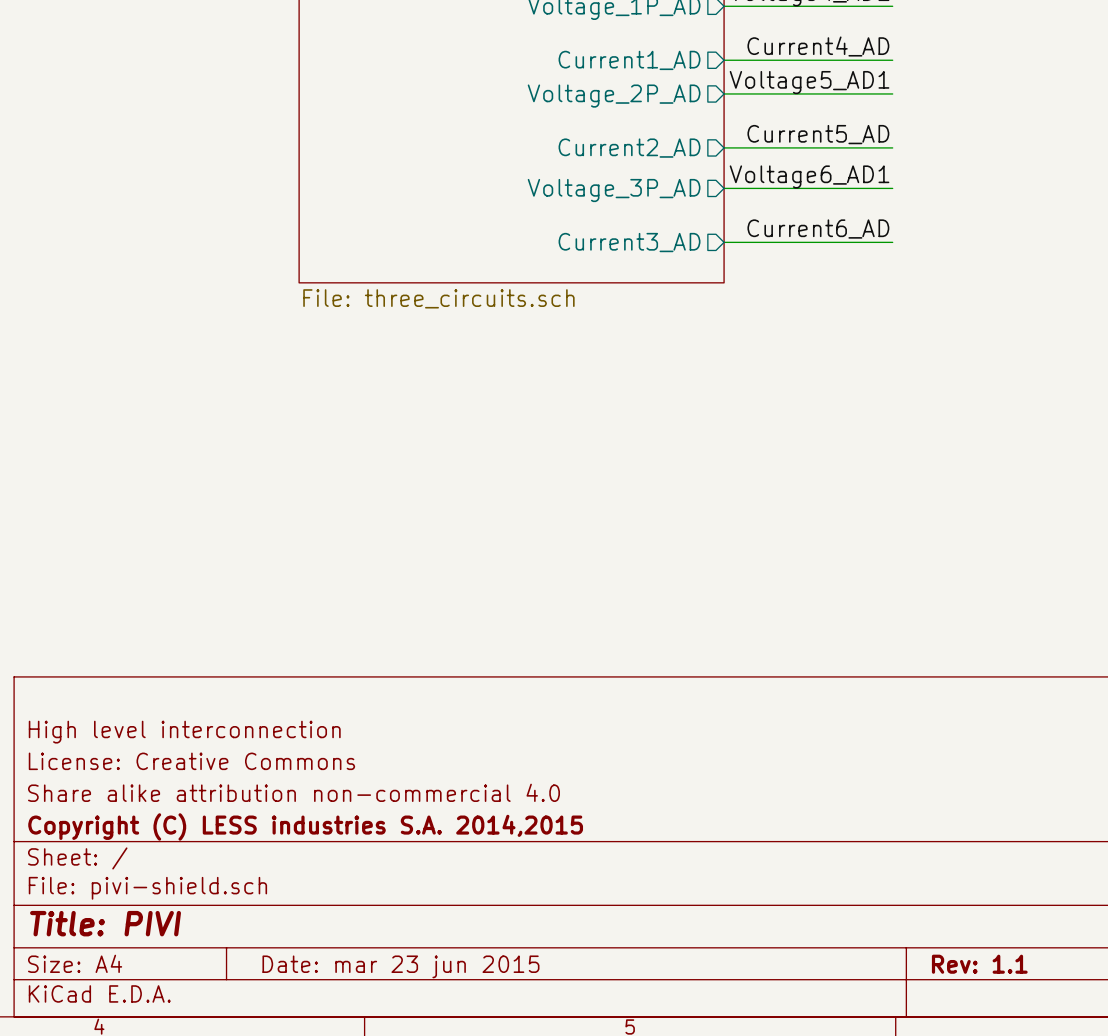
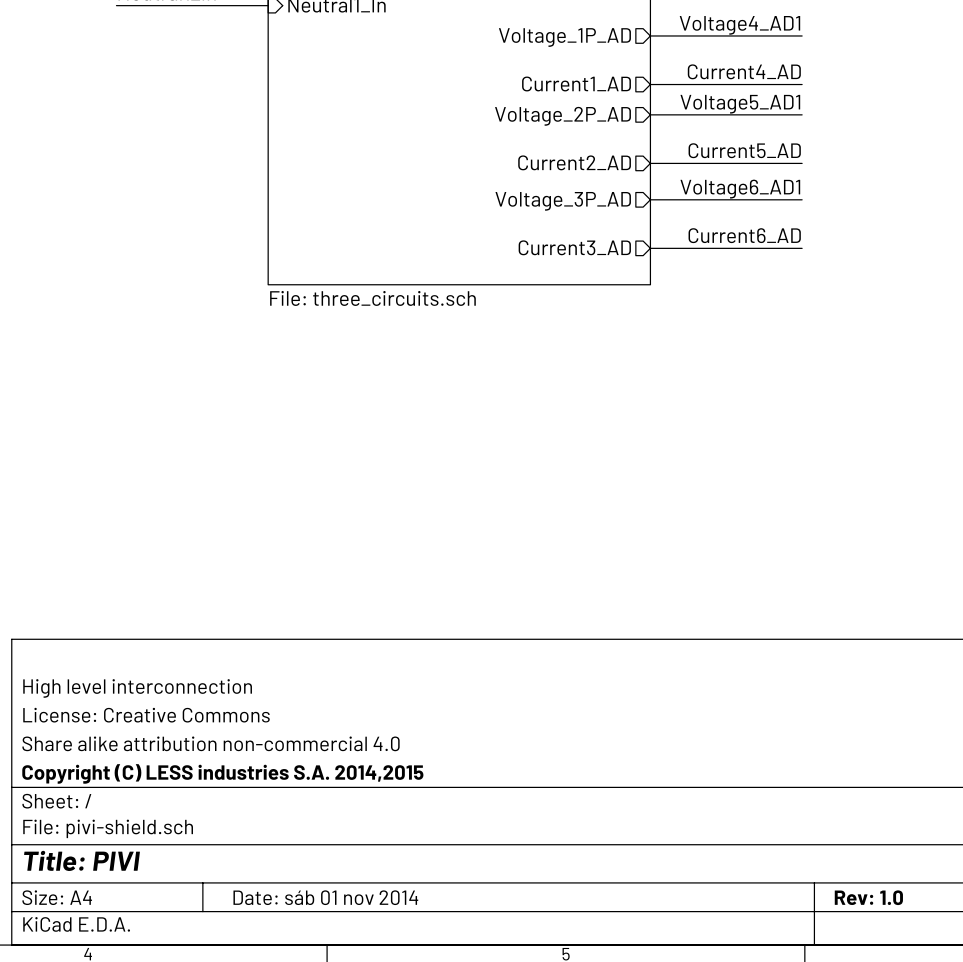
title block: Rev: 1.1 (979, 964) -> Rev: 1.0 (868, 897)
title block: Date: mar 23 jun 2015 (400, 966) -> Date: sáb 01 nov 2014 (325, 897)

